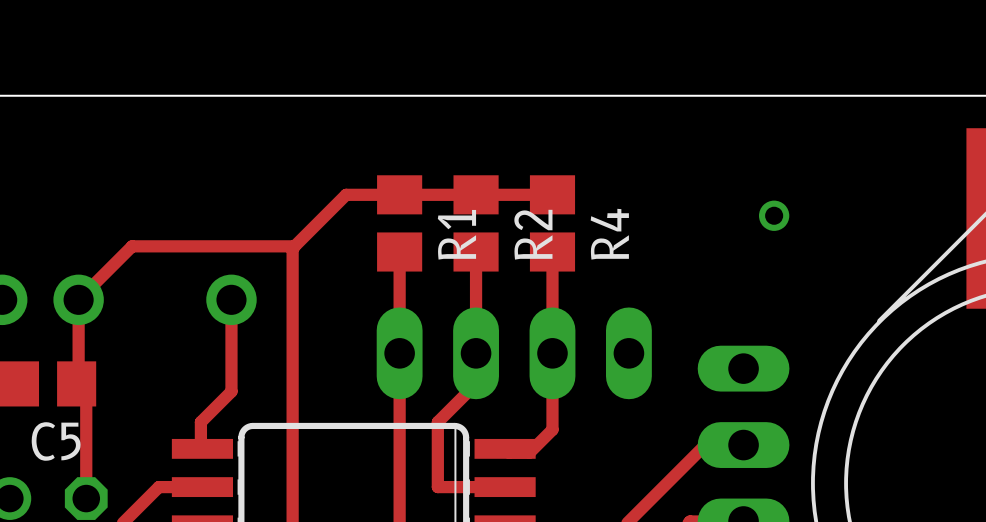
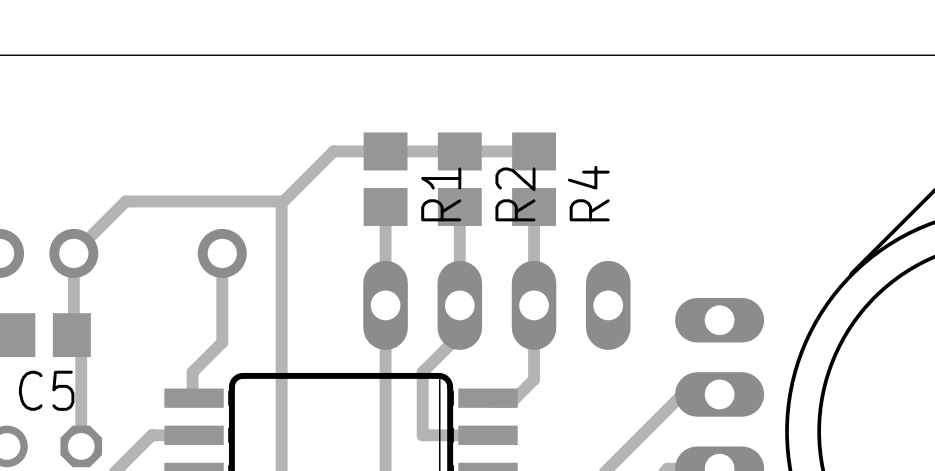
via: (774, 215) -> none

